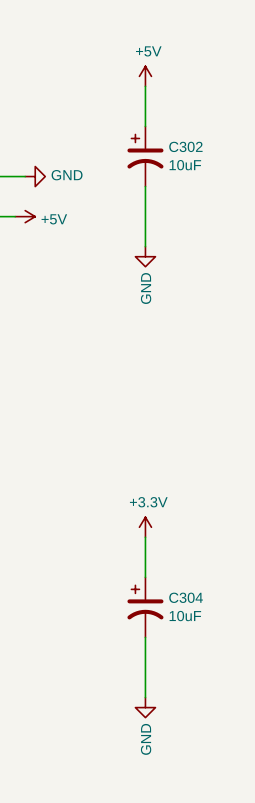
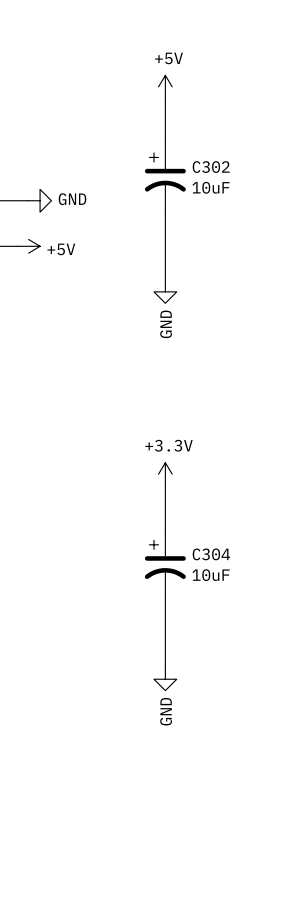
wire: none -> (165, 485) (165, 531)
power symbol position: +3.3V (145, 527) -> +3.3V (165, 474)
C304 position: (145, 607) -> (165, 565)
wire: (145, 637) (145, 697) -> none
power symbol position: GND (145, 707) -> GND (165, 679)

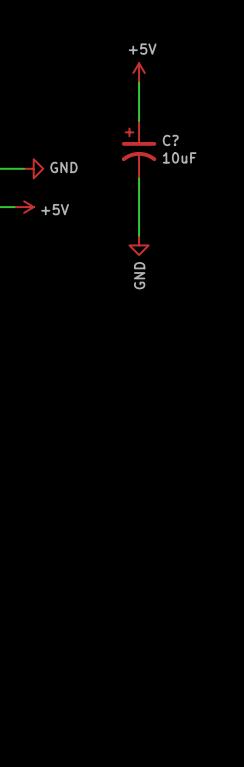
C302 name: C302 (211, 167) -> C? (170, 140)
power symbol: +3.3V (165, 474) -> none
wire: (165, 485) (165, 531) -> none
C304: 10uF (165, 565) -> none
wire: (165, 599) (165, 667) -> none
power symbol: GND (165, 679) -> none

